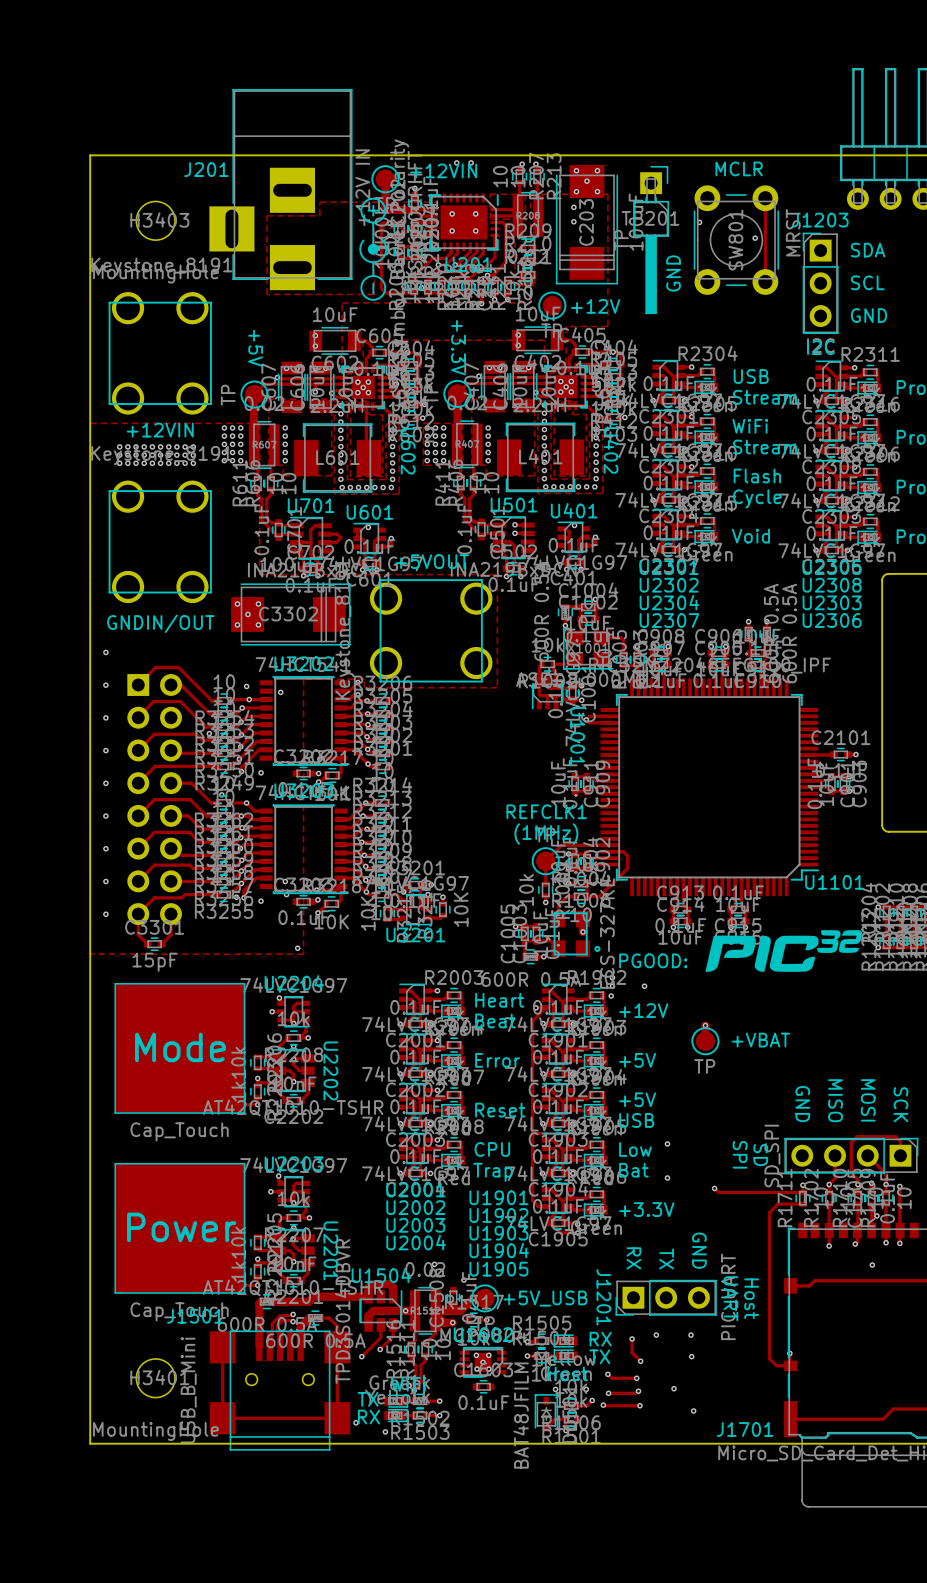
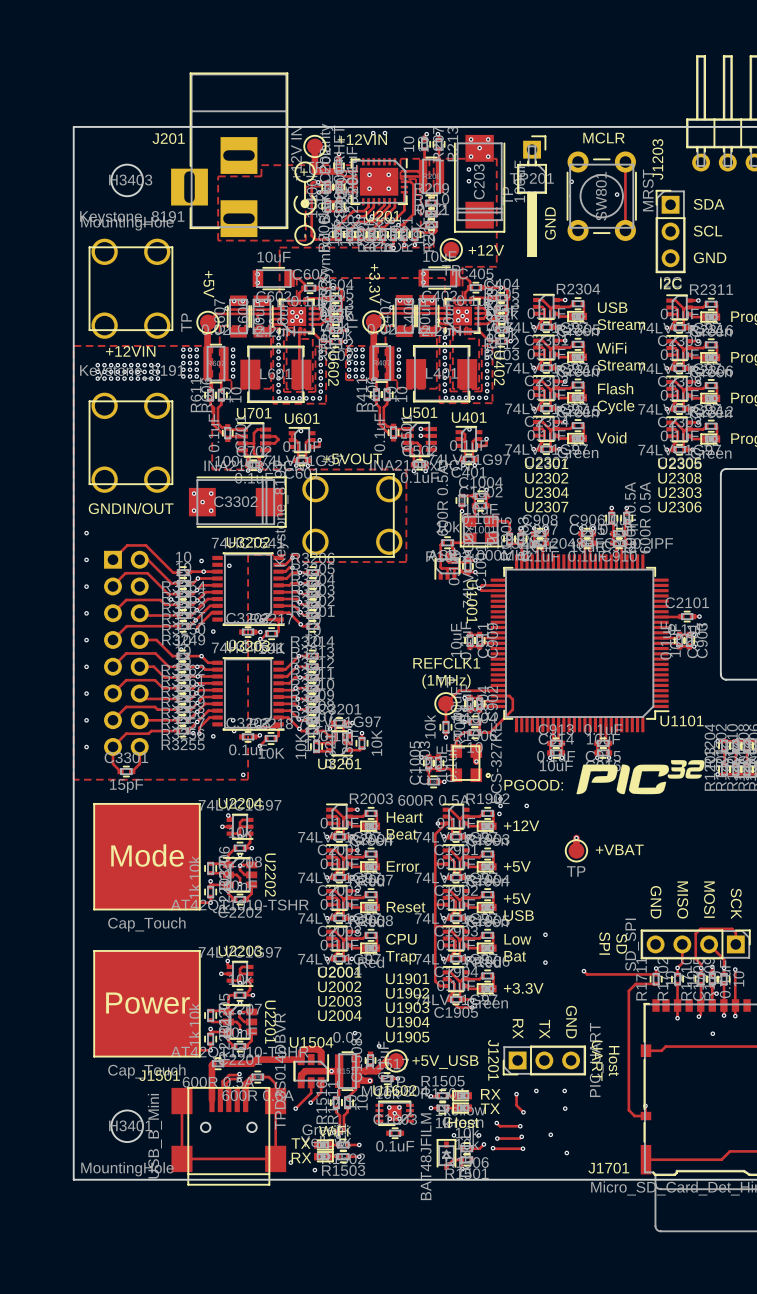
J1203 name rotation: 0° (820, 220) -> 90° counterclockwise (657, 159)

